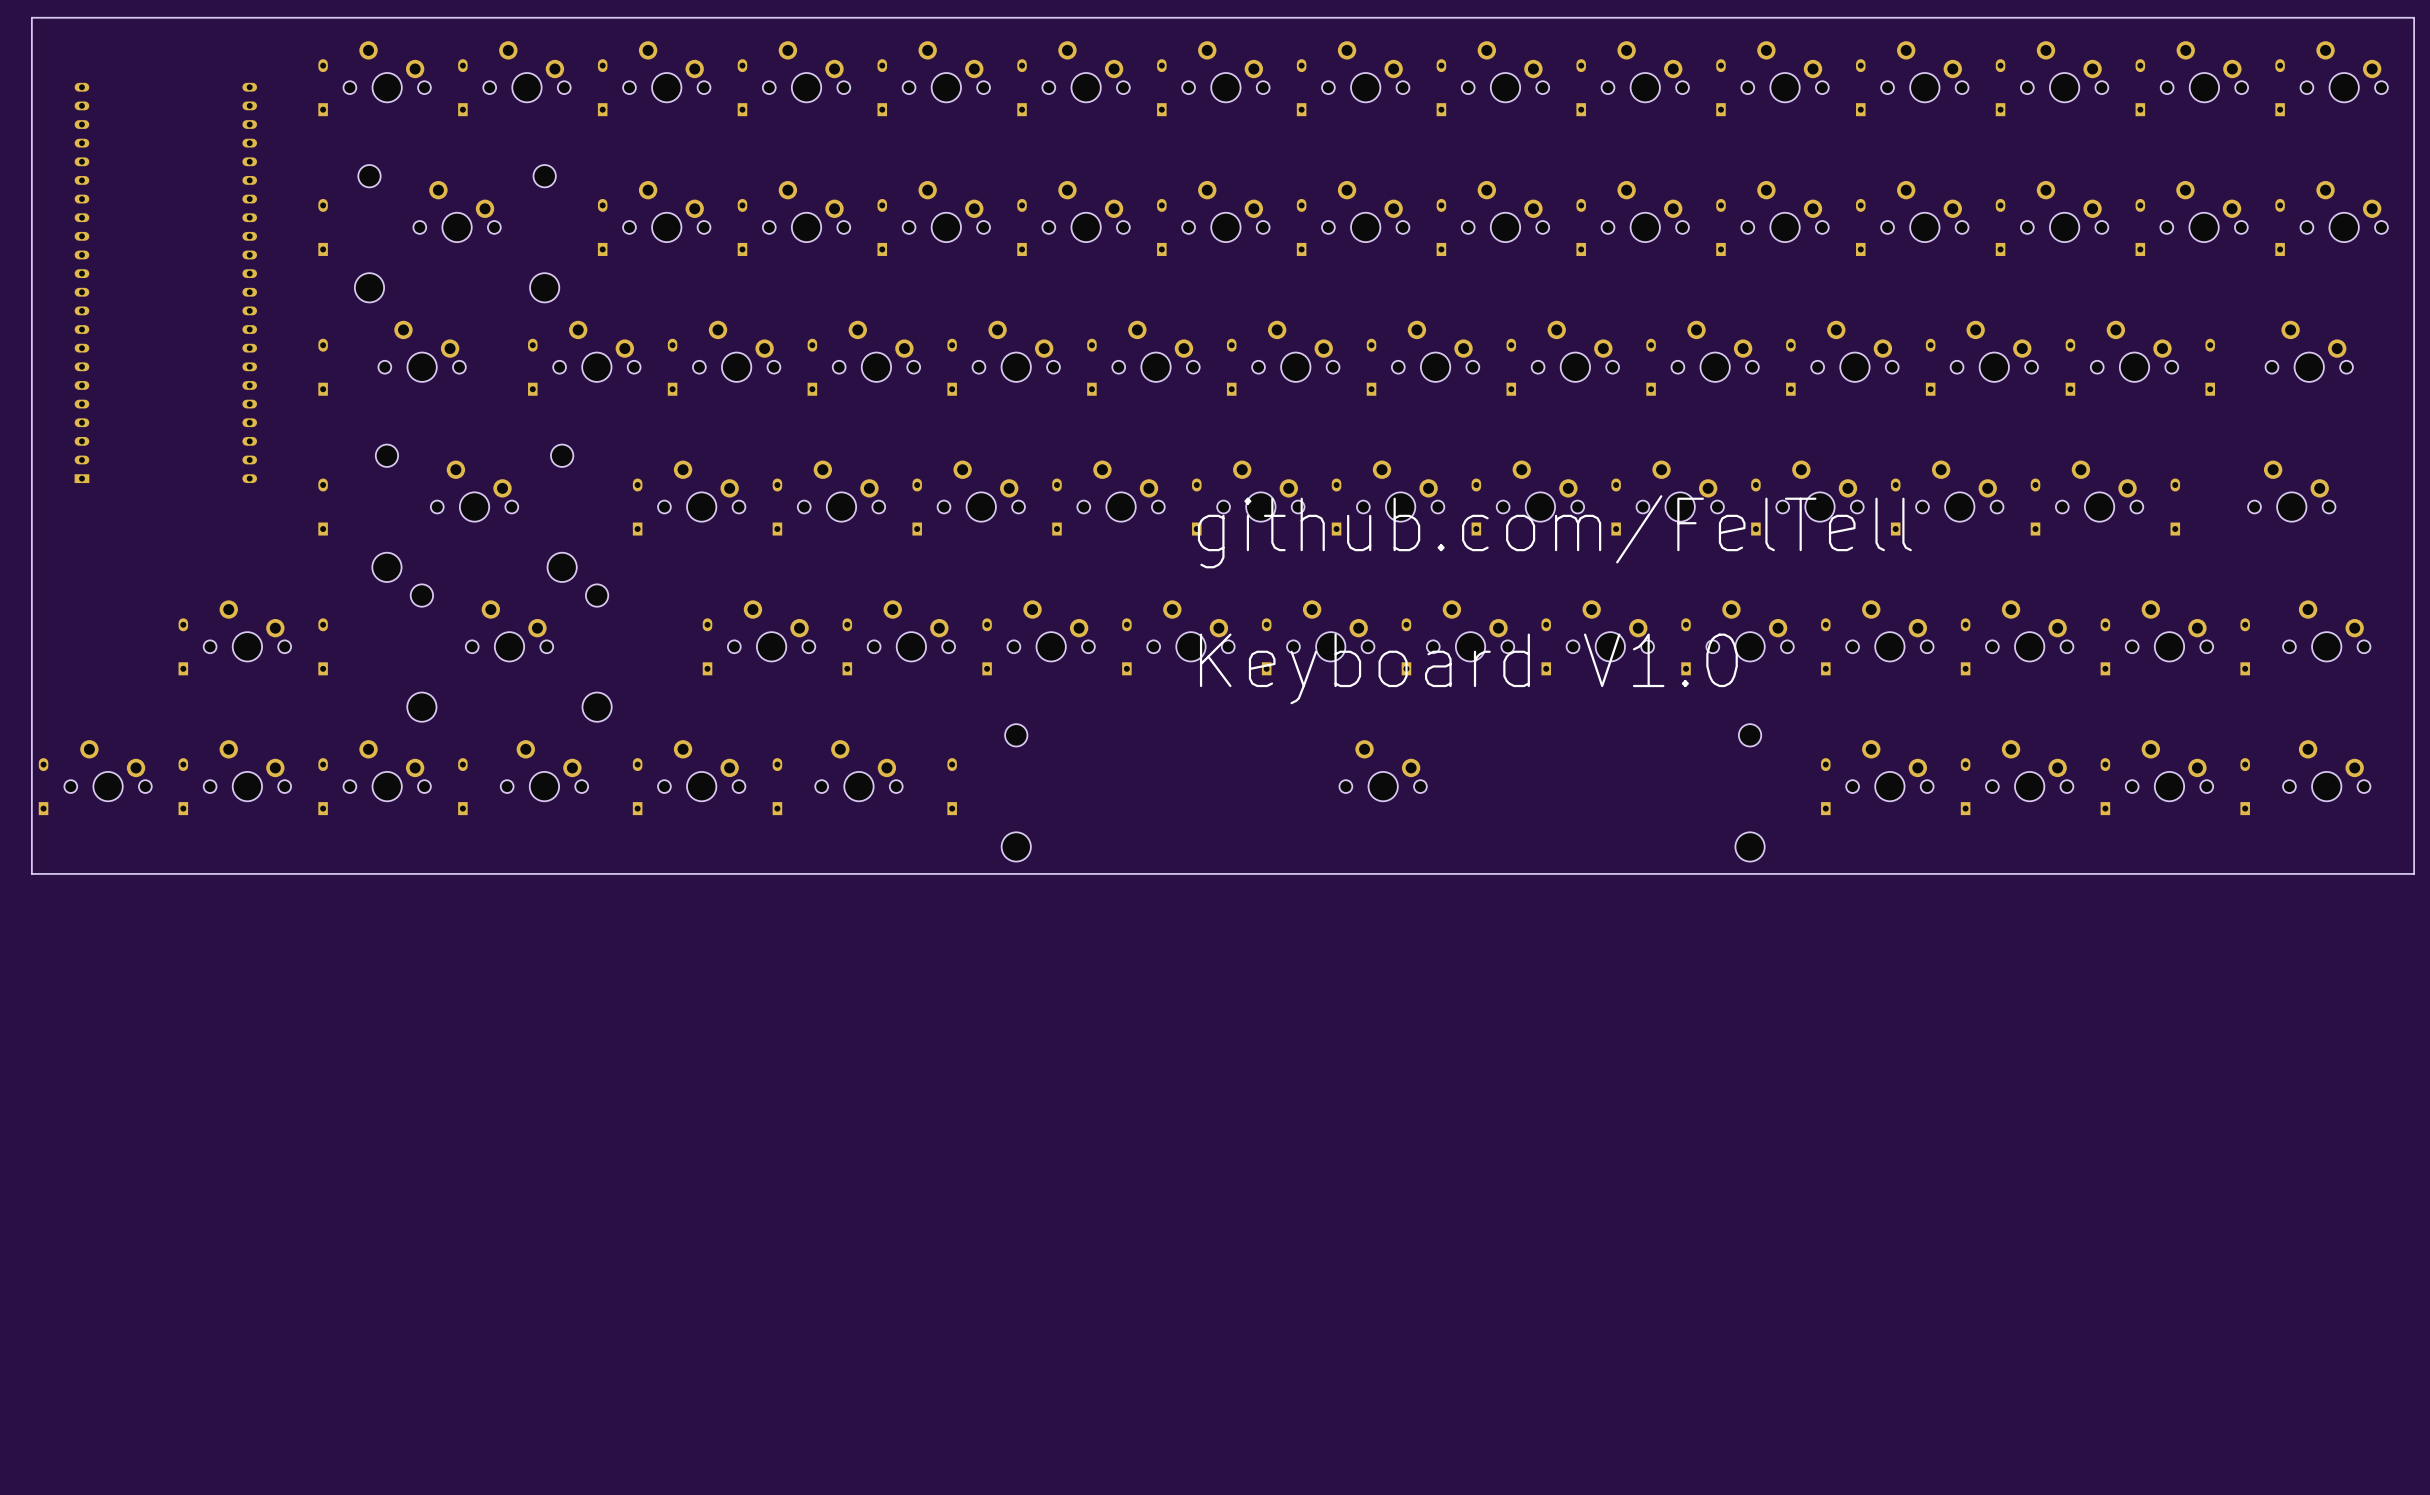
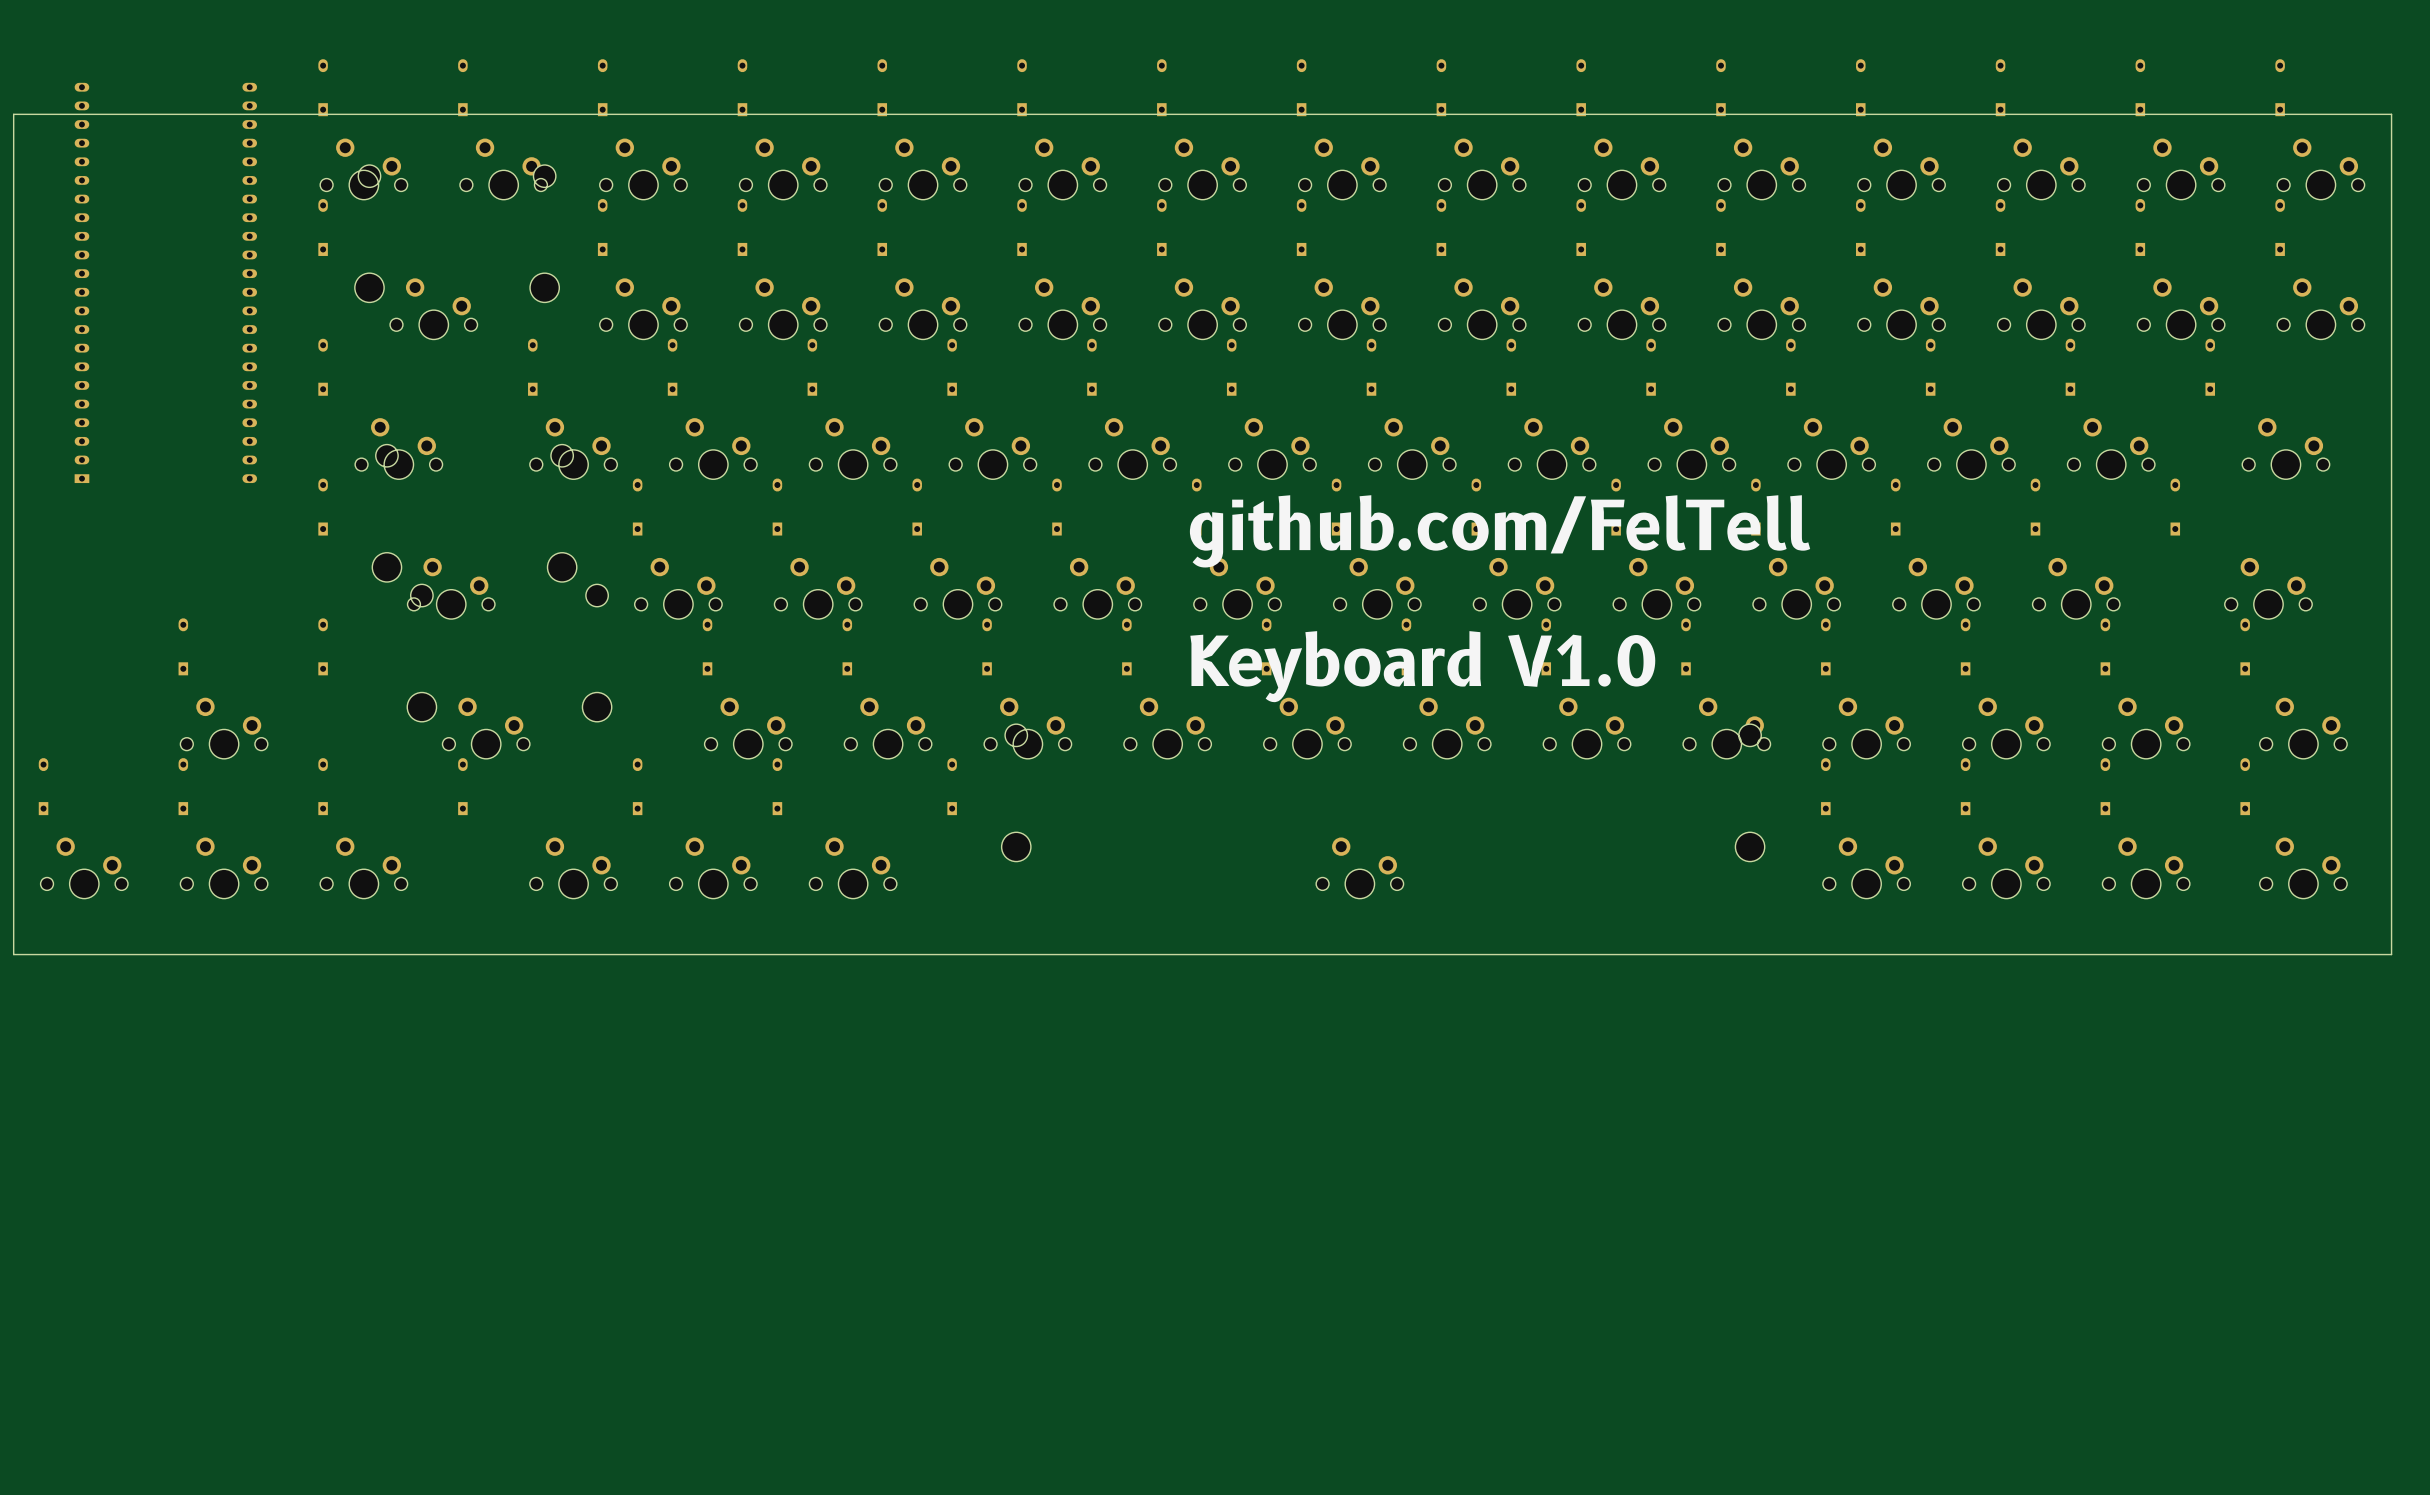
board edge: (2414, 17) (31, 17) (31, 873) (2414, 873) (2414, 17) -> (2391, 114) (2391, 954) (13, 954) (13, 114) (2391, 114)
part: (387, 71) -> none
part: (526, 71) -> none
part: (666, 71) -> none
part: (806, 71) -> none
part: (946, 71) -> none
part: (1086, 71) -> none
part: (1225, 71) -> none
part: (1365, 71) -> none
part: (1505, 71) -> none
part: (1645, 71) -> none
part: (1785, 71) -> none
part: (1924, 71) -> none
part: (2064, 71) -> none
part: (2204, 71) -> none
part: (2344, 71) -> none
part: none -> (363, 169)
part: none -> (503, 169)
part: (457, 211) -> none
part position: (666, 211) -> (643, 169)
part position: (806, 211) -> (783, 169)
part position: (946, 211) -> (923, 169)
part position: (1086, 211) -> (1062, 169)
part position: (1225, 211) -> (1202, 169)
part position: (1365, 211) -> (1342, 169)
part position: (1505, 211) -> (1482, 169)
part position: (1645, 211) -> (1621, 169)
part position: (1785, 211) -> (1761, 169)
part position: (1924, 211) -> (1901, 169)
part position: (2064, 211) -> (2041, 169)
part position: (2204, 211) -> (2181, 169)
part position: (2344, 211) -> (2320, 169)
part: none -> (643, 308)
part: none -> (783, 308)
part: none -> (923, 308)
part: none -> (1062, 308)
part: none -> (1202, 308)
part: none -> (1342, 308)
part: none -> (1482, 308)
part: none -> (1621, 308)
part: none -> (1761, 308)
part: none -> (1901, 308)
part: none -> (2041, 308)
part: none -> (2181, 308)
part position: (422, 351) -> (433, 308)
part: (596, 351) -> none
part: (736, 351) -> none
part: (876, 351) -> none
part: (1016, 351) -> none
part: (1156, 351) -> none
part: (1295, 351) -> none
part: (1435, 351) -> none
part: (1575, 351) -> none
part: (1715, 351) -> none
part: (1854, 351) -> none
part: (1994, 351) -> none
part: (2134, 351) -> none
part position: (2309, 351) -> (2320, 308)
part: none -> (398, 448)
part: none -> (573, 448)
part: (474, 491) -> none
part position: (701, 491) -> (713, 448)
part position: (841, 491) -> (853, 448)
part position: (981, 491) -> (992, 448)
part position: (1121, 491) -> (1132, 448)
part position: (1260, 491) -> (1272, 448)
part position: (1400, 491) -> (1412, 448)
part position: (1540, 491) -> (1552, 448)
part position: (1680, 491) -> (1691, 448)
part position: (1819, 491) -> (1831, 448)
part position: (1959, 491) -> (1971, 448)
part position: (2099, 491) -> (2111, 448)
part position: (2291, 491) -> (2285, 448)
part: none -> (451, 588)
part: none -> (678, 588)
part: none -> (818, 588)
part: none -> (957, 588)
part: none -> (1097, 588)
part: none -> (1237, 588)
part: none -> (1377, 588)
part: none -> (1517, 588)
part: none -> (1656, 588)
part: none -> (1796, 588)
part: none -> (1936, 588)
part: none -> (2076, 588)
part: none -> (2268, 588)
part: (247, 630) -> none
part: (509, 630) -> none
part: (771, 630) -> none
part: (911, 630) -> none
part: (1051, 630) -> none
part: (1190, 630) -> none
part: (1330, 630) -> none
part: (1470, 630) -> none
part: (1610, 630) -> none
part: (1750, 630) -> none
part: (1889, 630) -> none
part: (2029, 630) -> none
part: (2169, 630) -> none
part: (2326, 630) -> none
part: none -> (486, 728)
part: none -> (748, 728)
part: none -> (888, 728)
part: none -> (1027, 728)
part: none -> (1167, 728)
part: none -> (1307, 728)
part: none -> (1447, 728)
part: none -> (1587, 728)
part: none -> (1726, 728)
part: (108, 770) -> none
part position: (247, 770) -> (224, 728)
part: (387, 770) -> none
part: (544, 770) -> none
part: (701, 770) -> none
part: (858, 770) -> none
part: (1383, 770) -> none
part position: (1889, 770) -> (1866, 728)
part position: (2029, 770) -> (2006, 728)
part position: (2169, 770) -> (2146, 728)
part position: (2326, 770) -> (2303, 728)
part: none -> (84, 868)
part: none -> (224, 868)
part: none -> (363, 868)
part: none -> (573, 868)
part: none -> (713, 868)
part: none -> (853, 868)
part: none -> (1359, 868)
part: none -> (1866, 868)
part: none -> (2006, 868)
part: none -> (2146, 868)
part: none -> (2303, 868)

